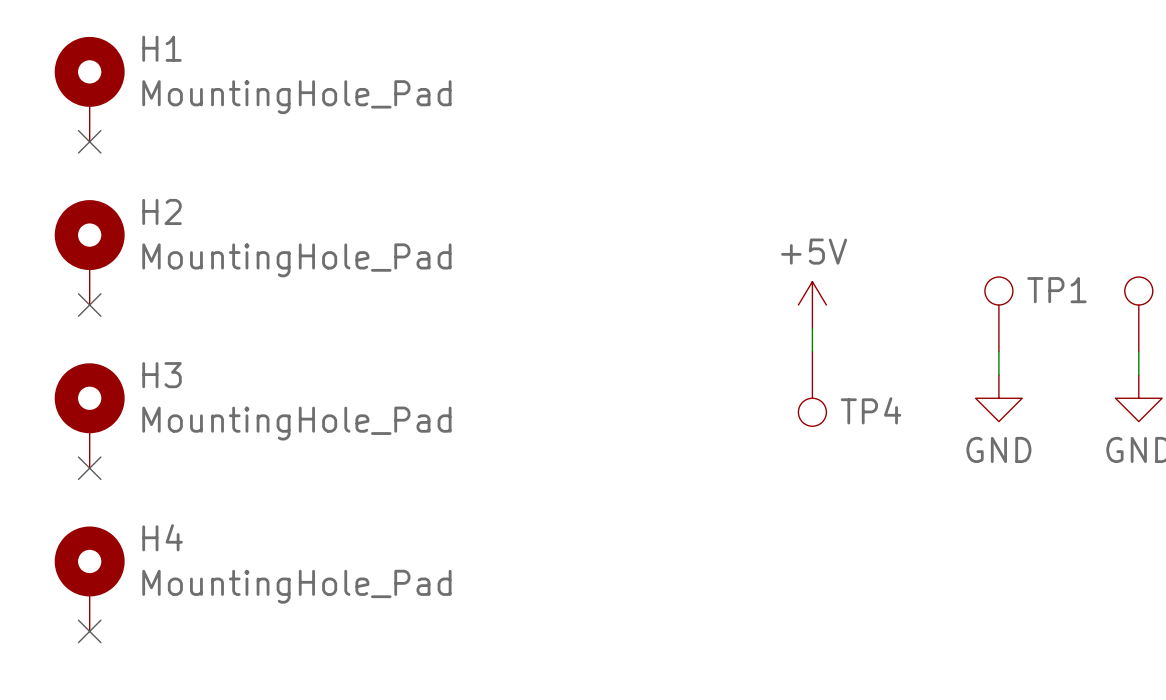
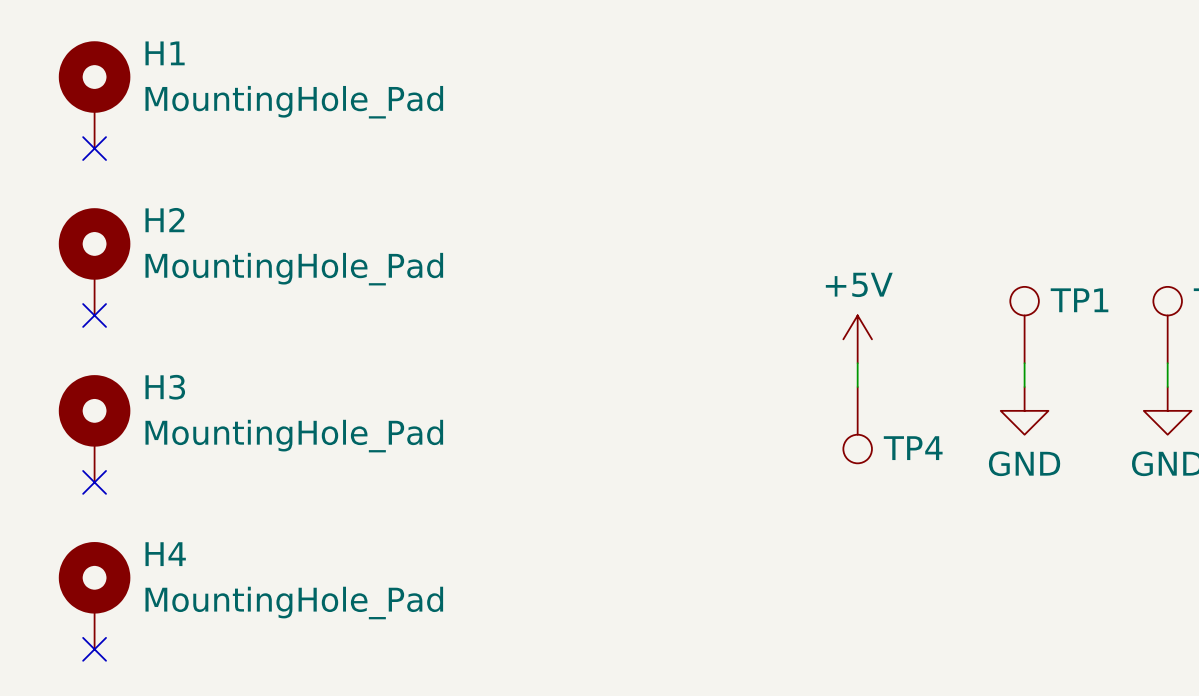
power symbol position: +5V (812, 305) -> +5V (857, 339)
wire: (812, 328) (812, 351) -> (857, 363) (857, 387)
TP4 position: (812, 388) -> (857, 425)

